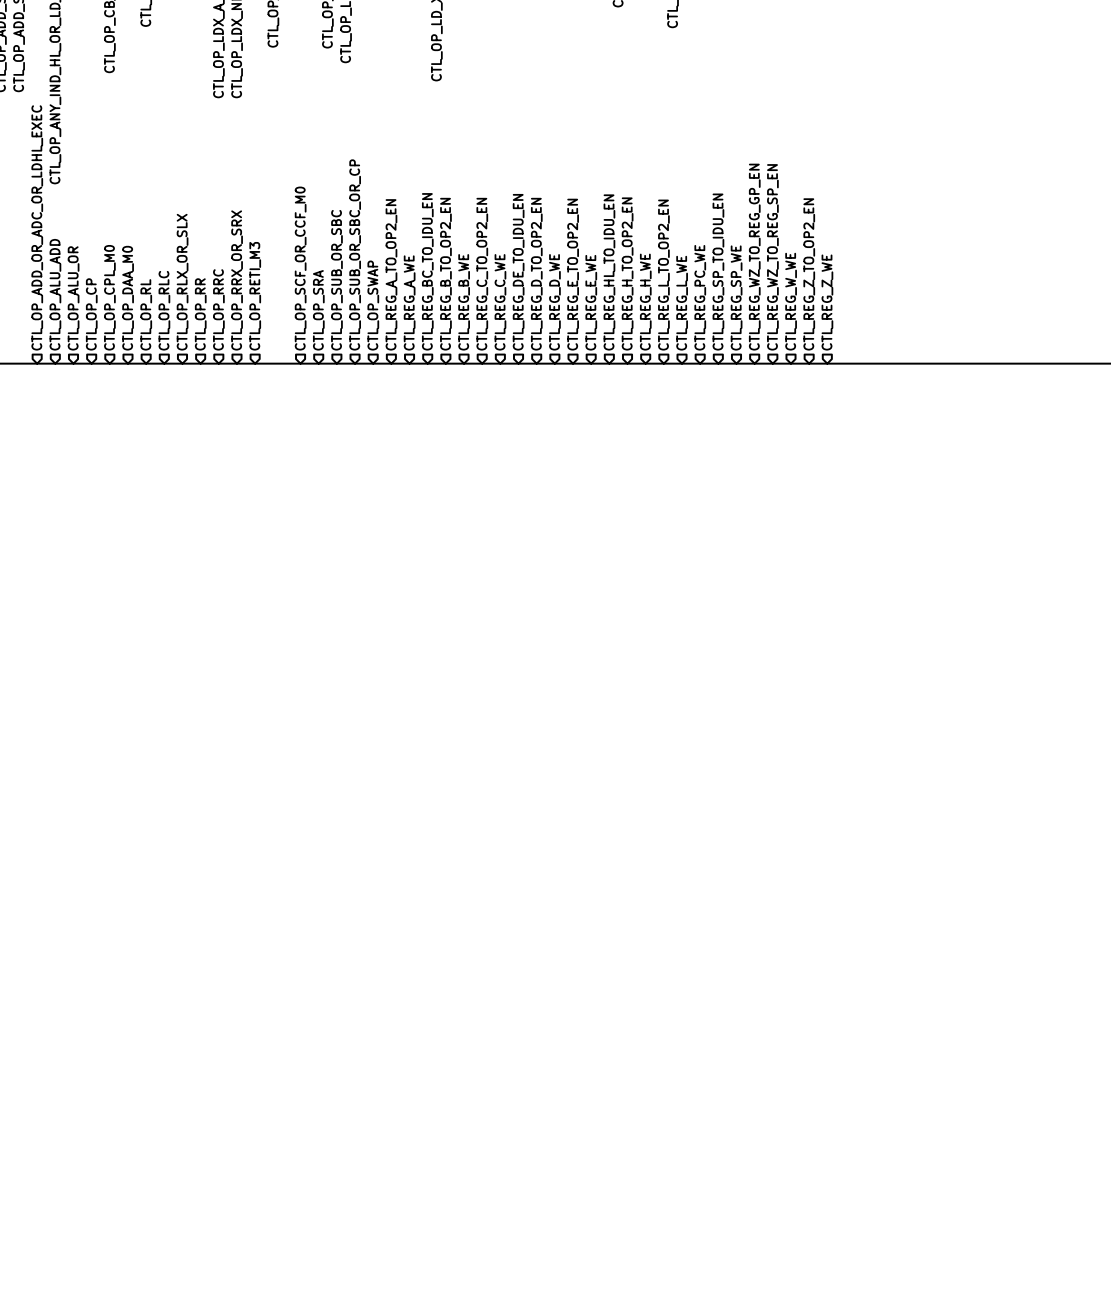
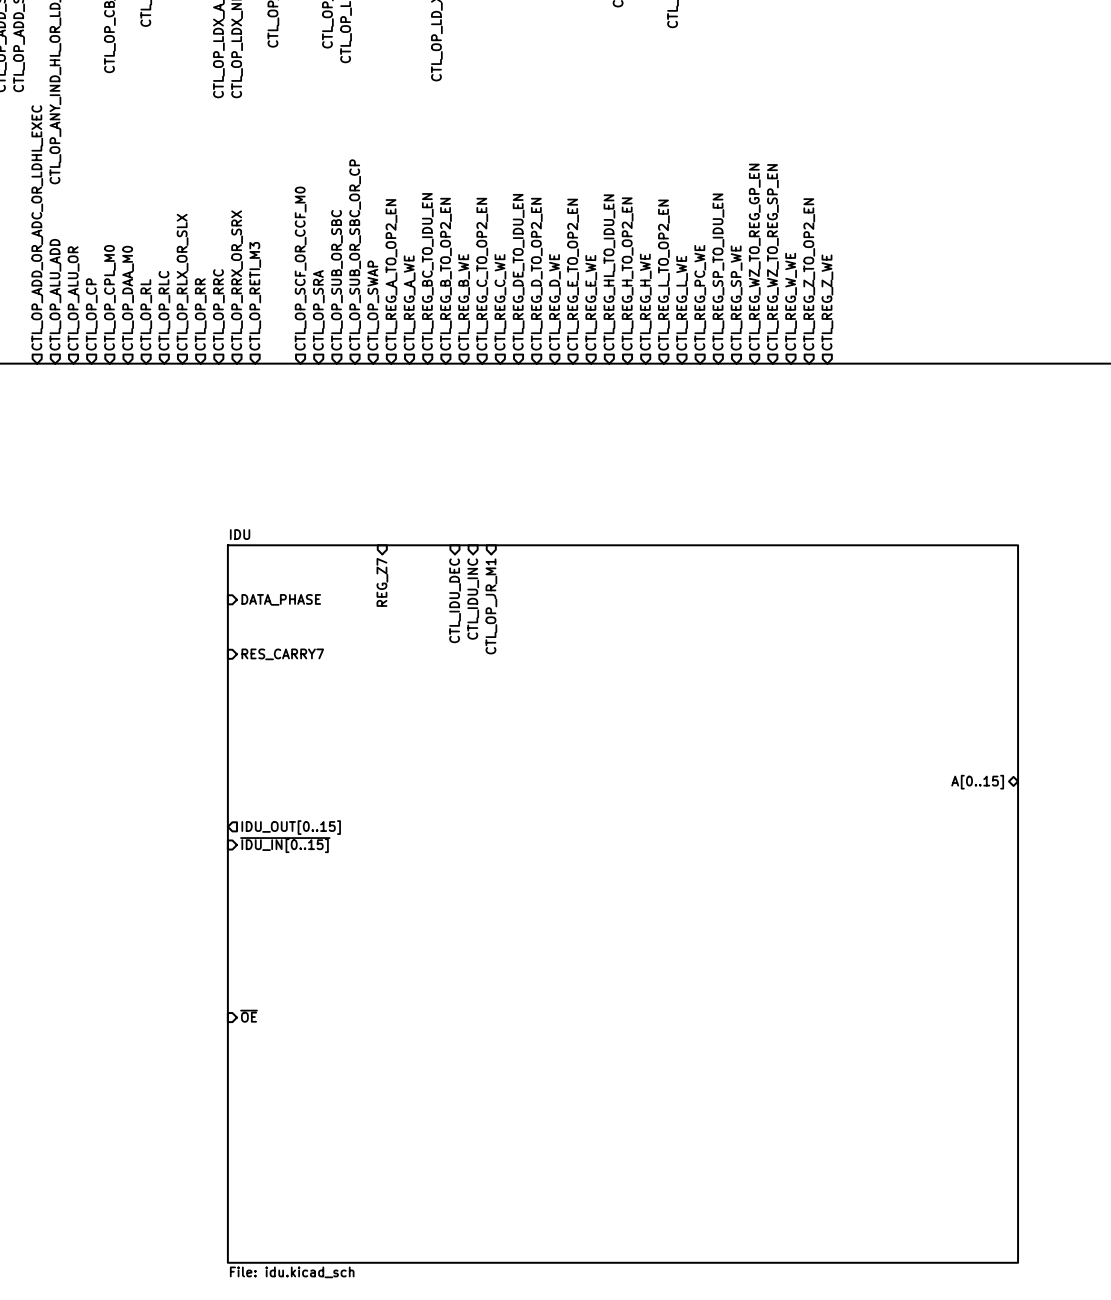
sheet pin: none -> REG_Z7 (382, 582)
sheet pin: none -> DATA_PHASE (281, 599)
sheet pin: none -> CTL_IDU_INC (473, 599)
sheet pin: none -> CTL_IDU_DEC (455, 600)
sheet pin: none -> CTL_OP_JR_M1 (491, 606)
sheet pin: none -> RES_CARRY7 (282, 654)
sheet pin: none -> A[0..15] (977, 782)
sheet pin: none -> IDU_OUT[0..15] (291, 827)
sheet pin: none -> ~{IDU_IN[0..15]} (285, 845)
sheet IDU: none -> File: idu.kicad_sch (622, 904)
sheet pin: none -> ~{OE} (249, 1016)

